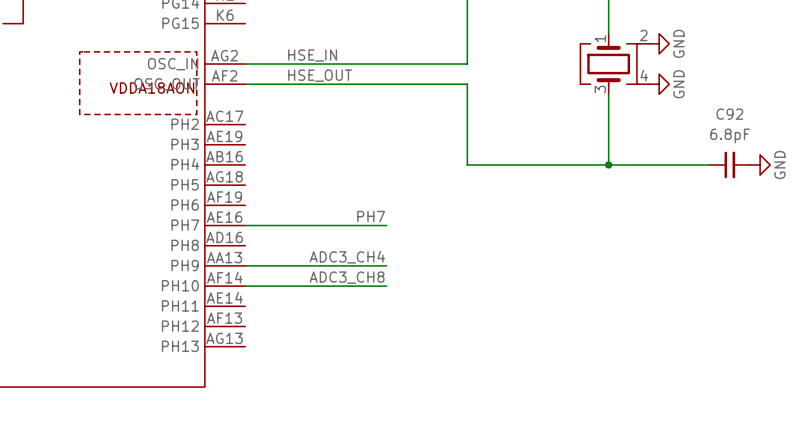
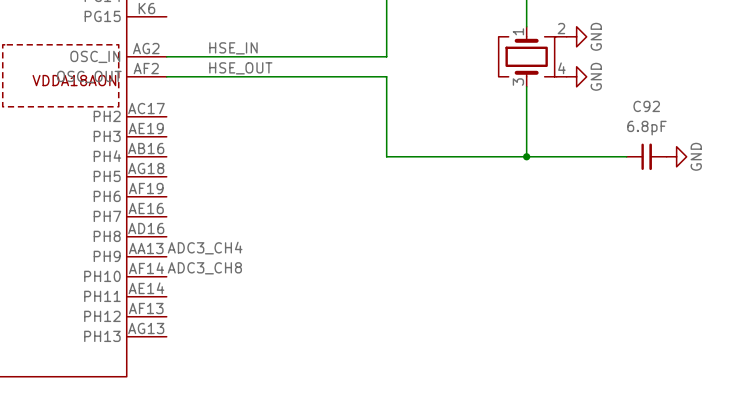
label: PH7 (371, 216) -> none
wire: (245, 225) (386, 225) -> none
label position: ADC3_CH4 (347, 257) -> ADC3_CH4 (205, 248)
wire: (245, 265) (386, 265) -> none
label position: ADC3_CH8 (347, 277) -> ADC3_CH8 (204, 268)
wire: (245, 286) (386, 286) -> none

